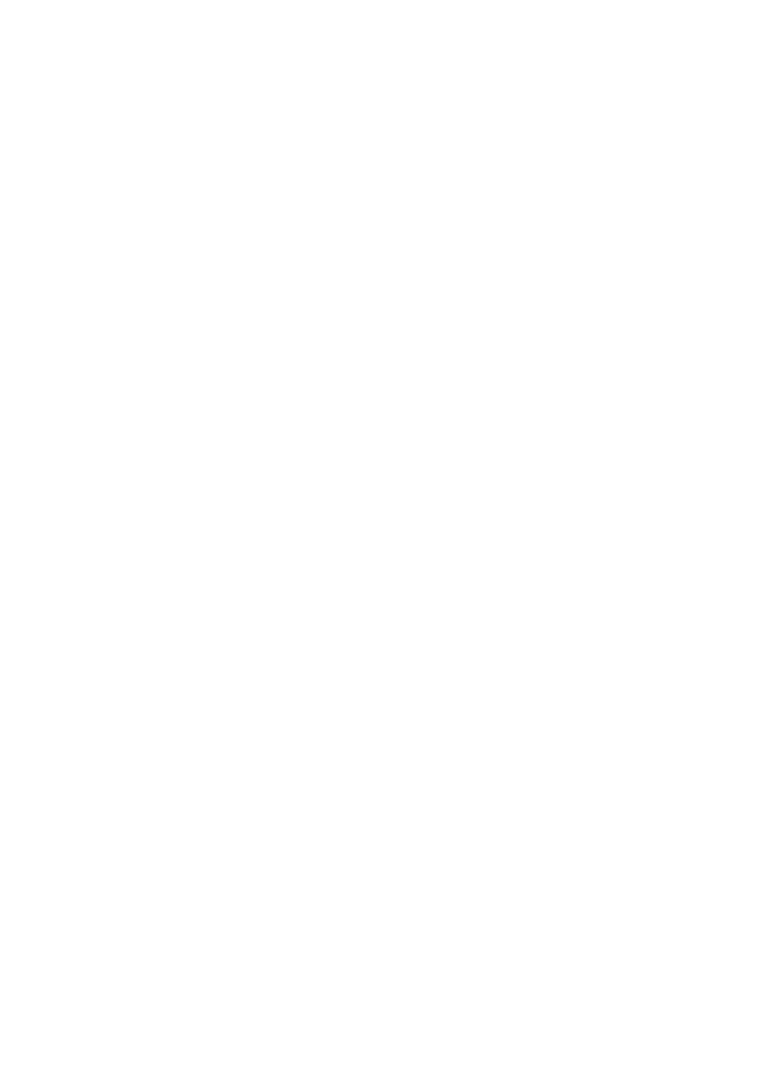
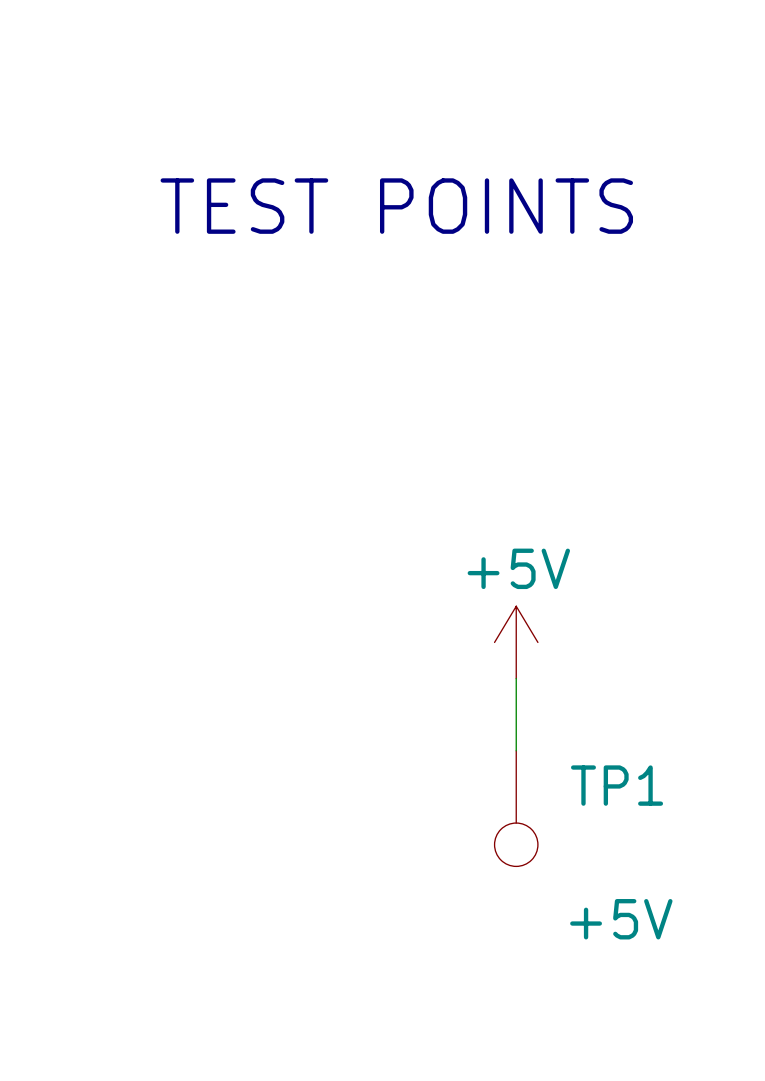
text: none -> TEST POINTS (396, 206)
power symbol: none -> +5V (516, 642)
wire: none -> (516, 678) (516, 750)
TP1: none -> +5V (516, 808)

